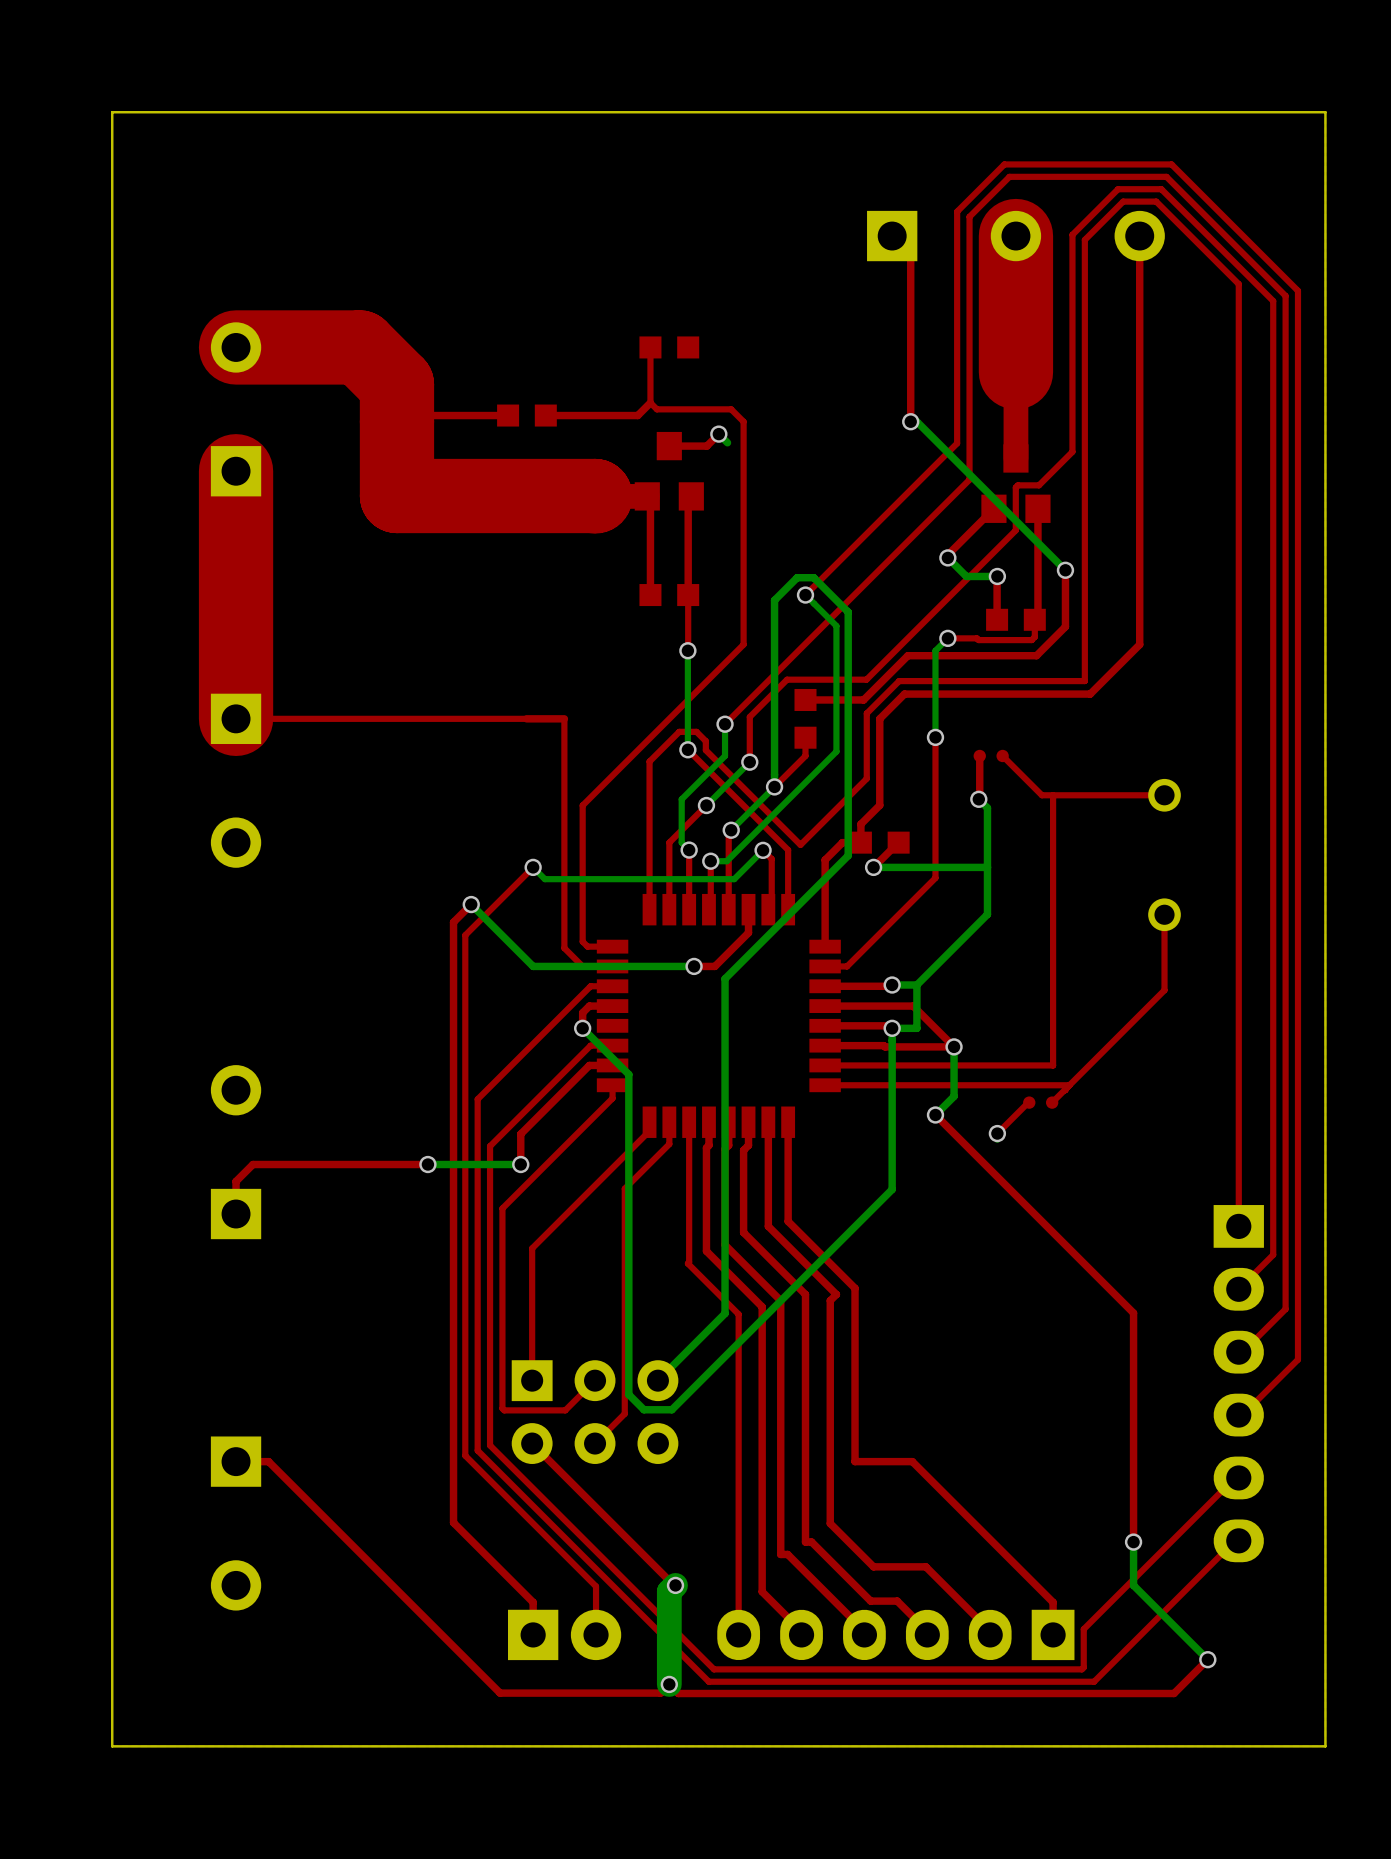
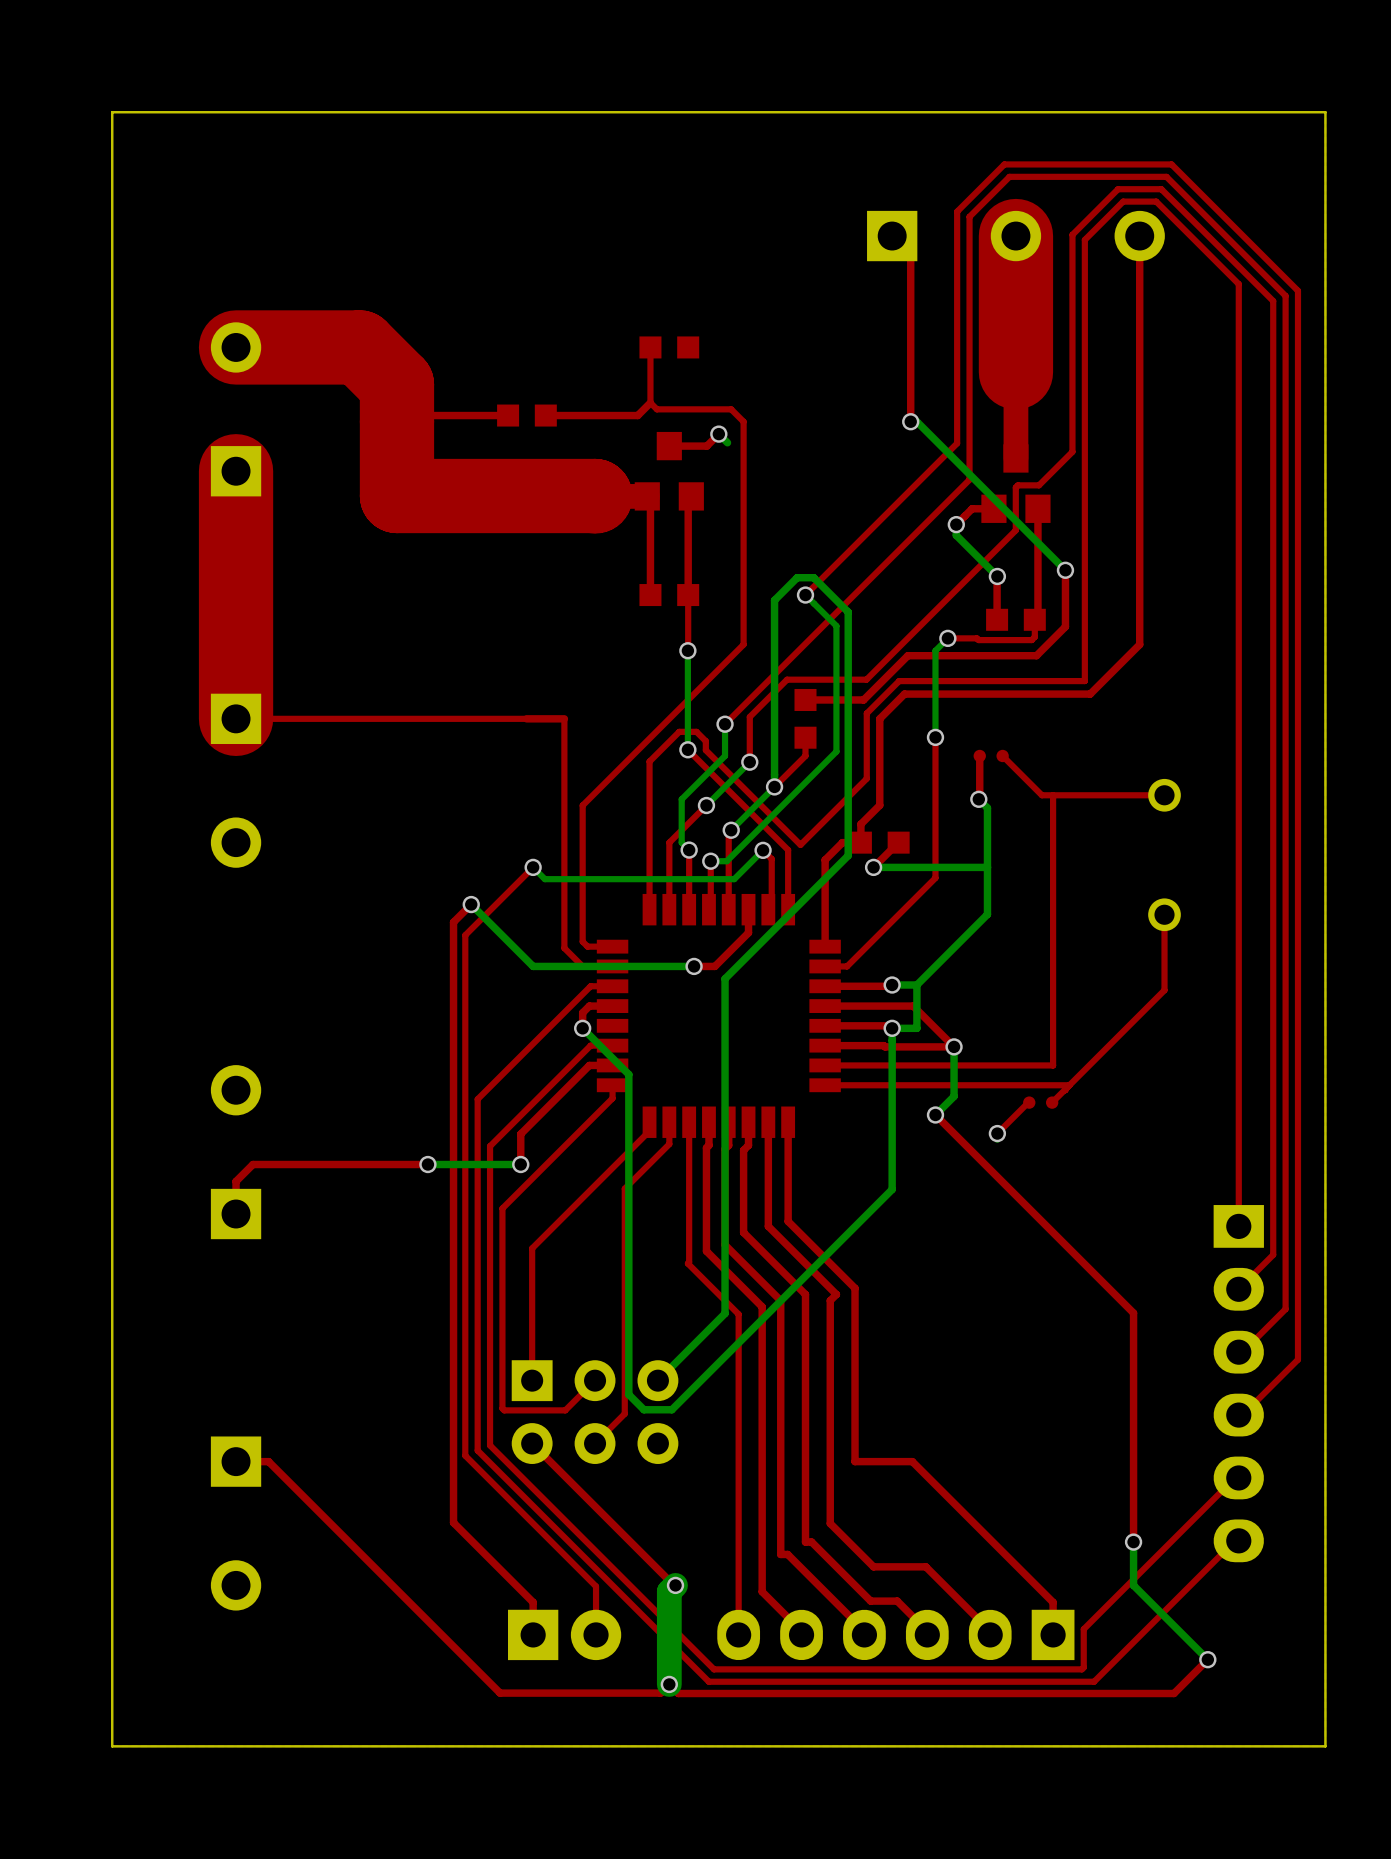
top track: (993, 508) (947, 554) (947, 557) -> (993, 508) (972, 508) (956, 524)
bottom track: (947, 557) (966, 576) (997, 576) -> (956, 524) (956, 535) (997, 576)
via position: (947, 557) -> (956, 524)

